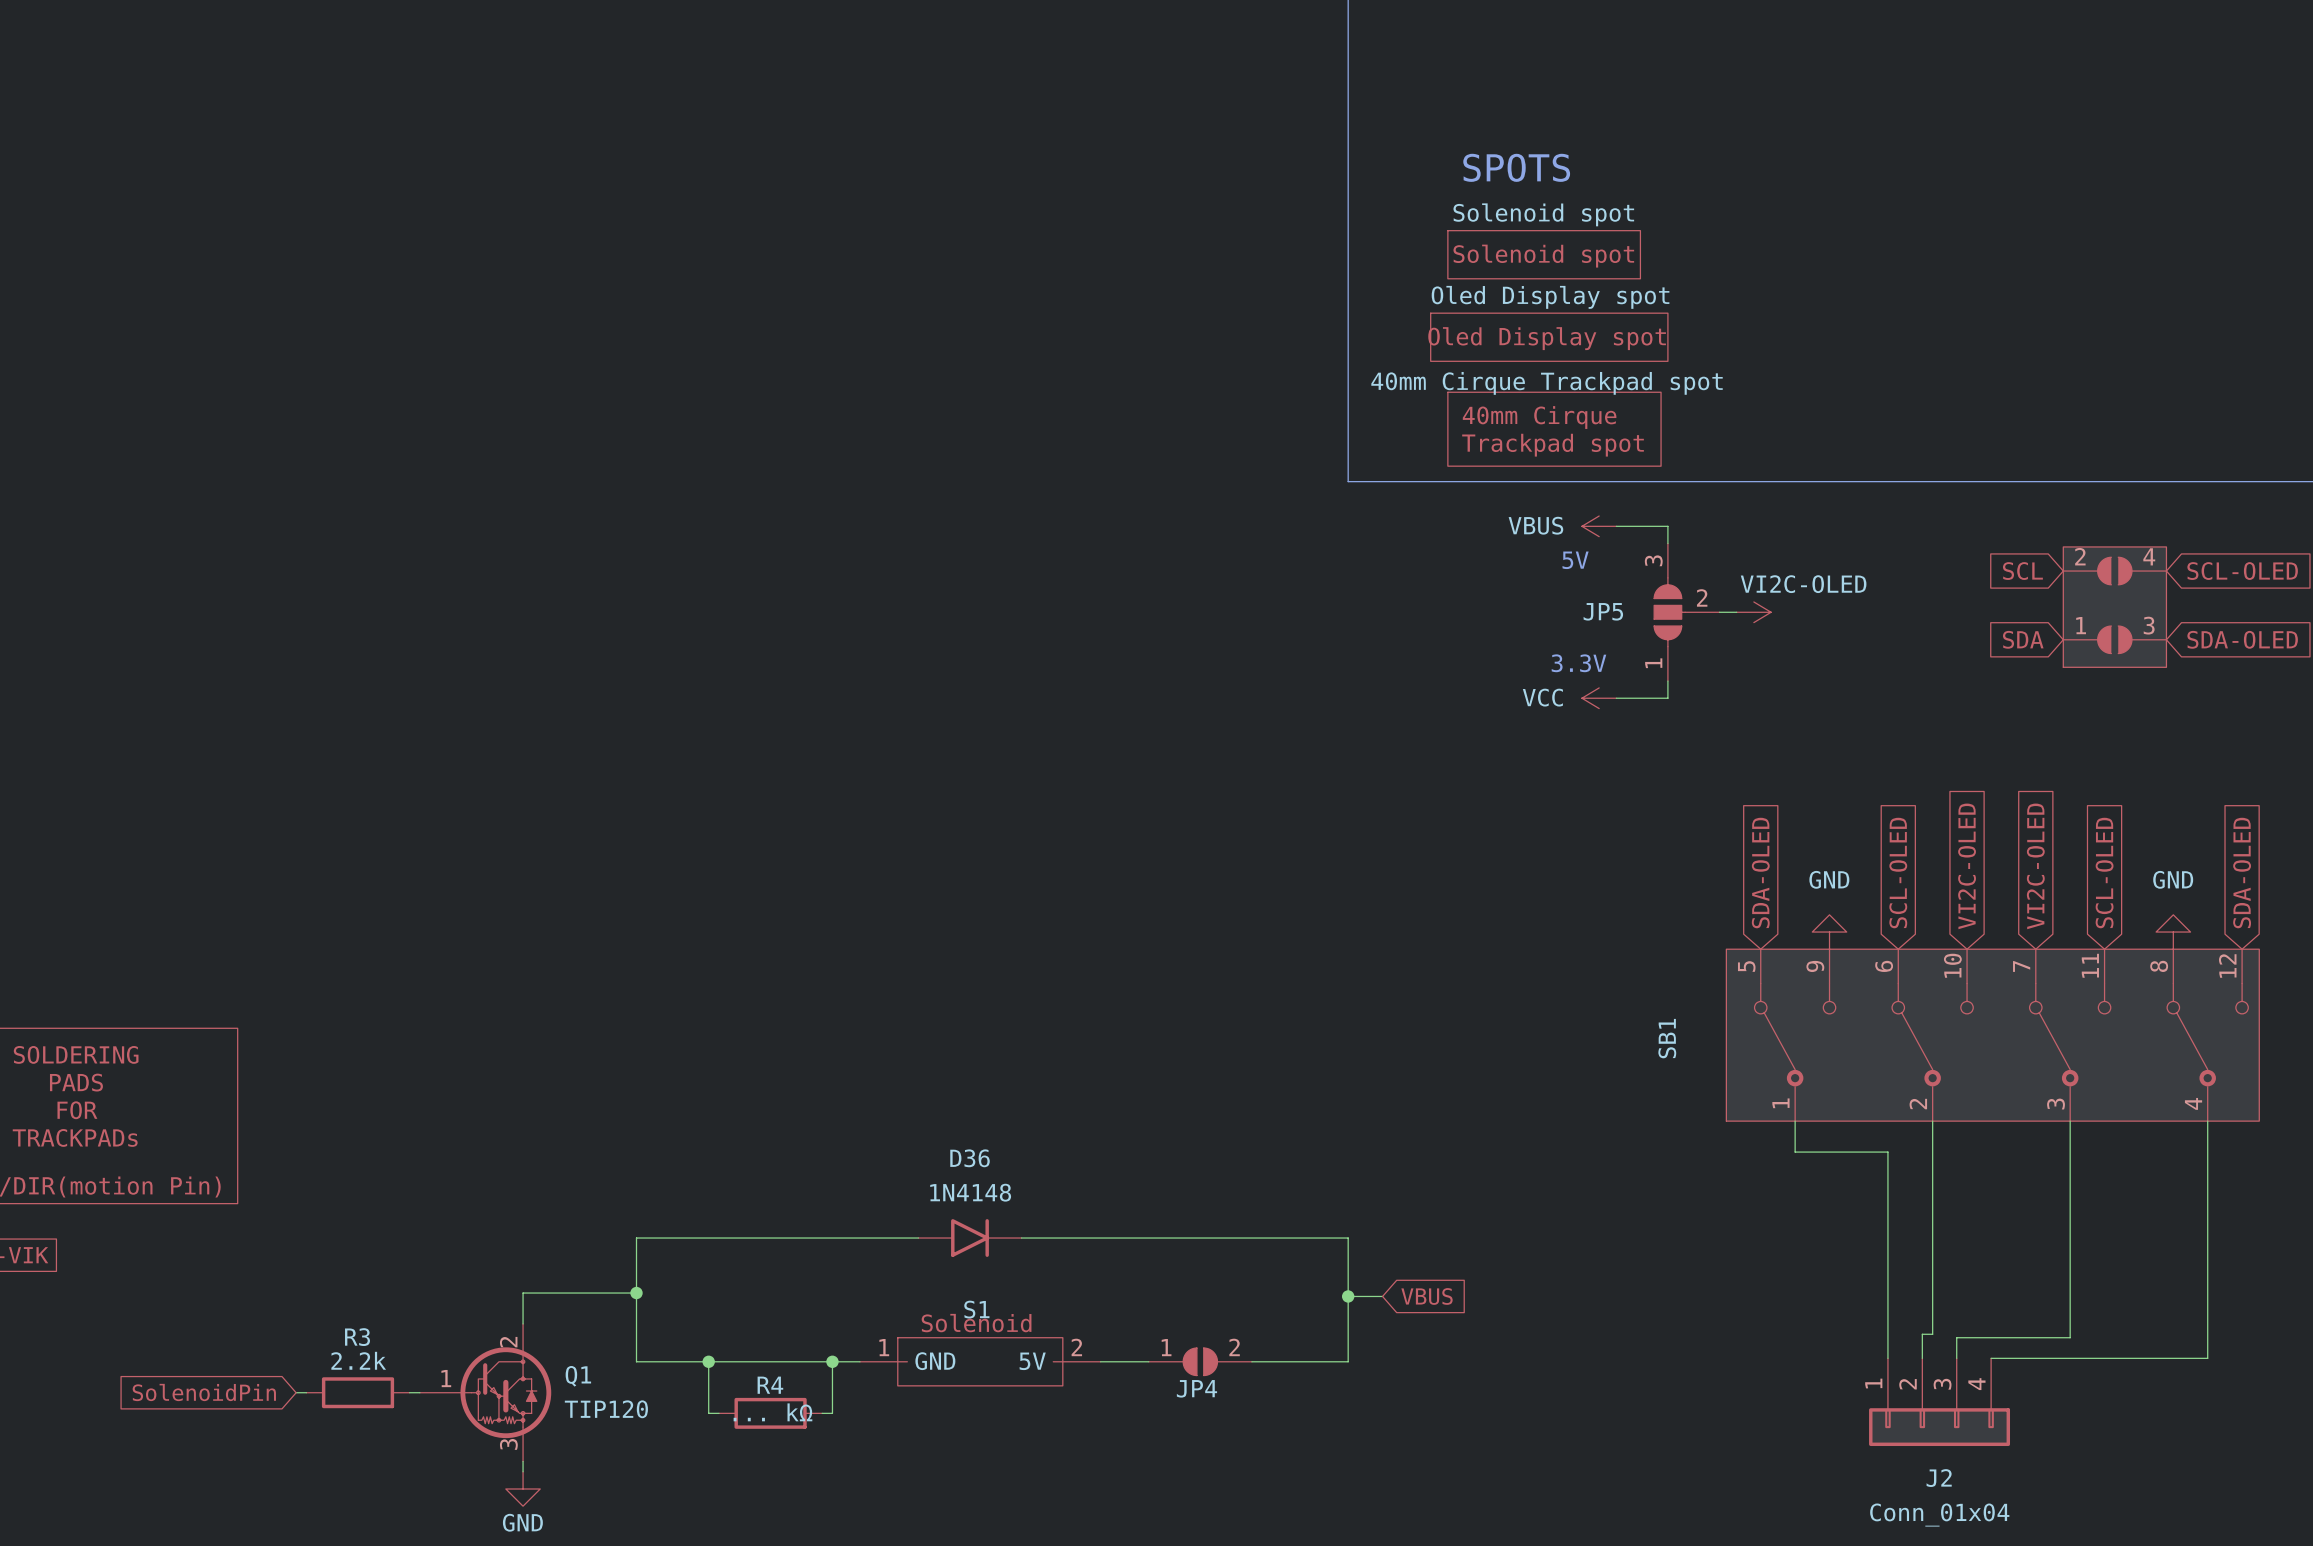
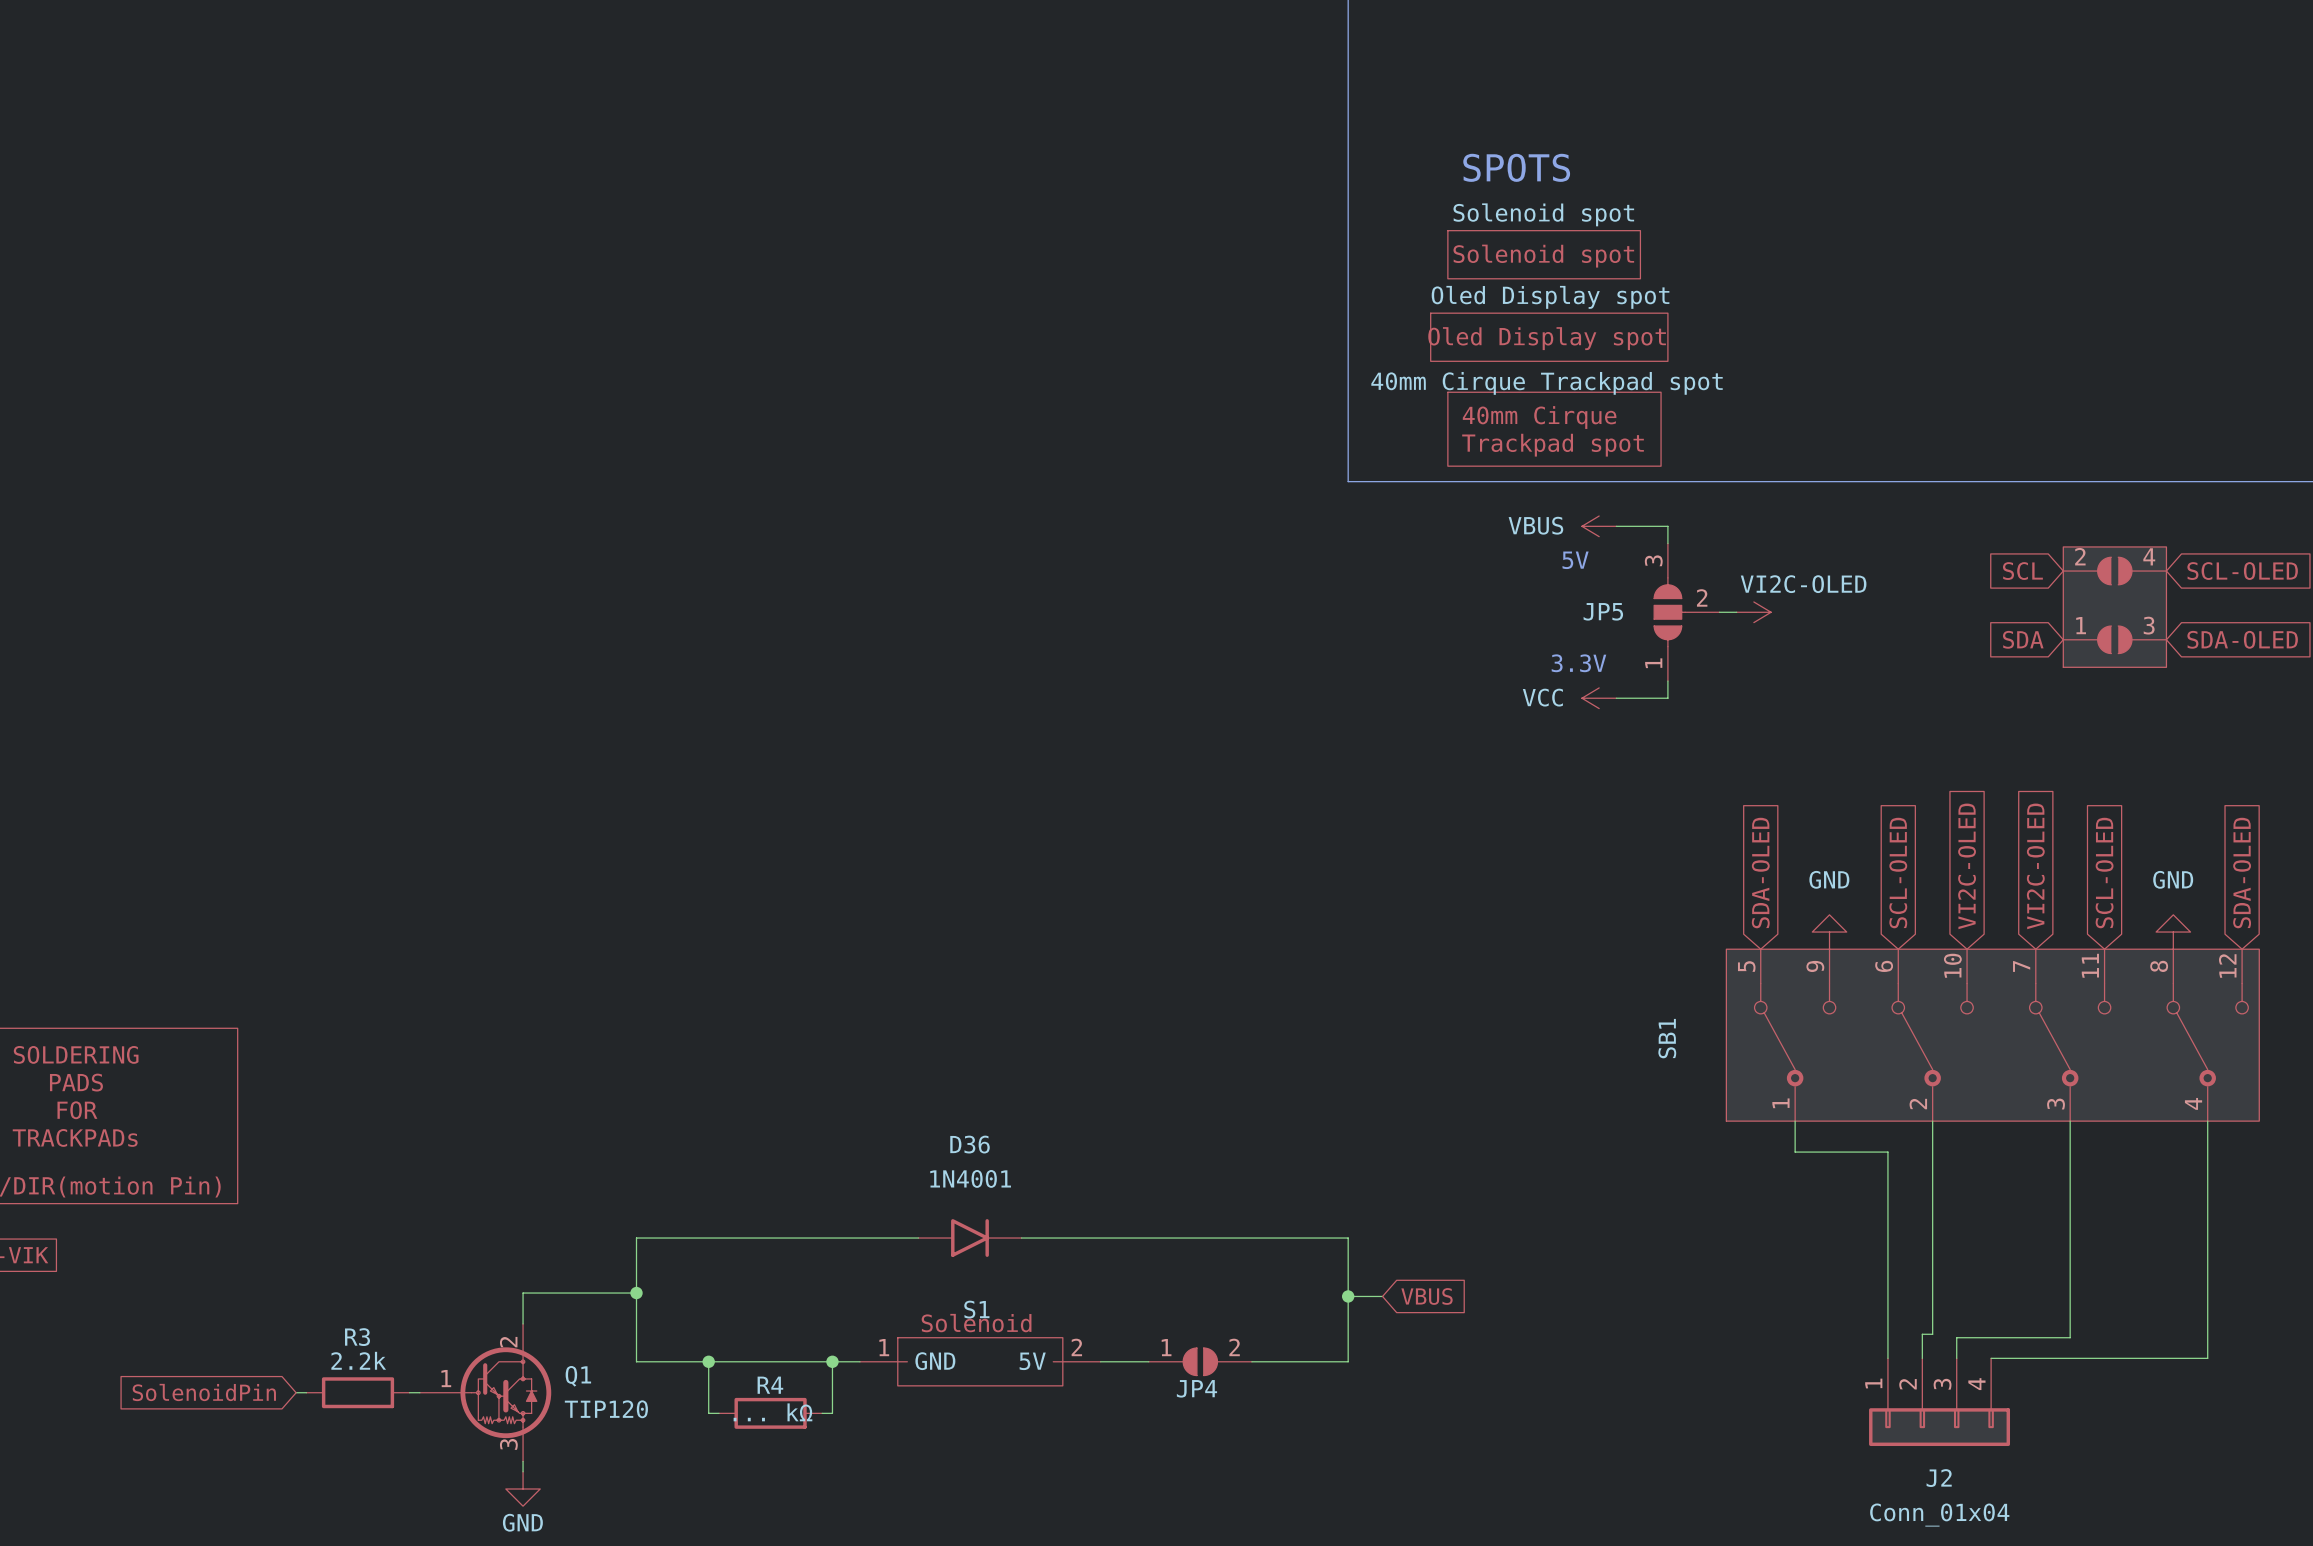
D36 name position: D36 (970, 1158) -> D36 (970, 1144)
D36 value: 1N4148 (970, 1192) -> 1N4001 (970, 1178)

